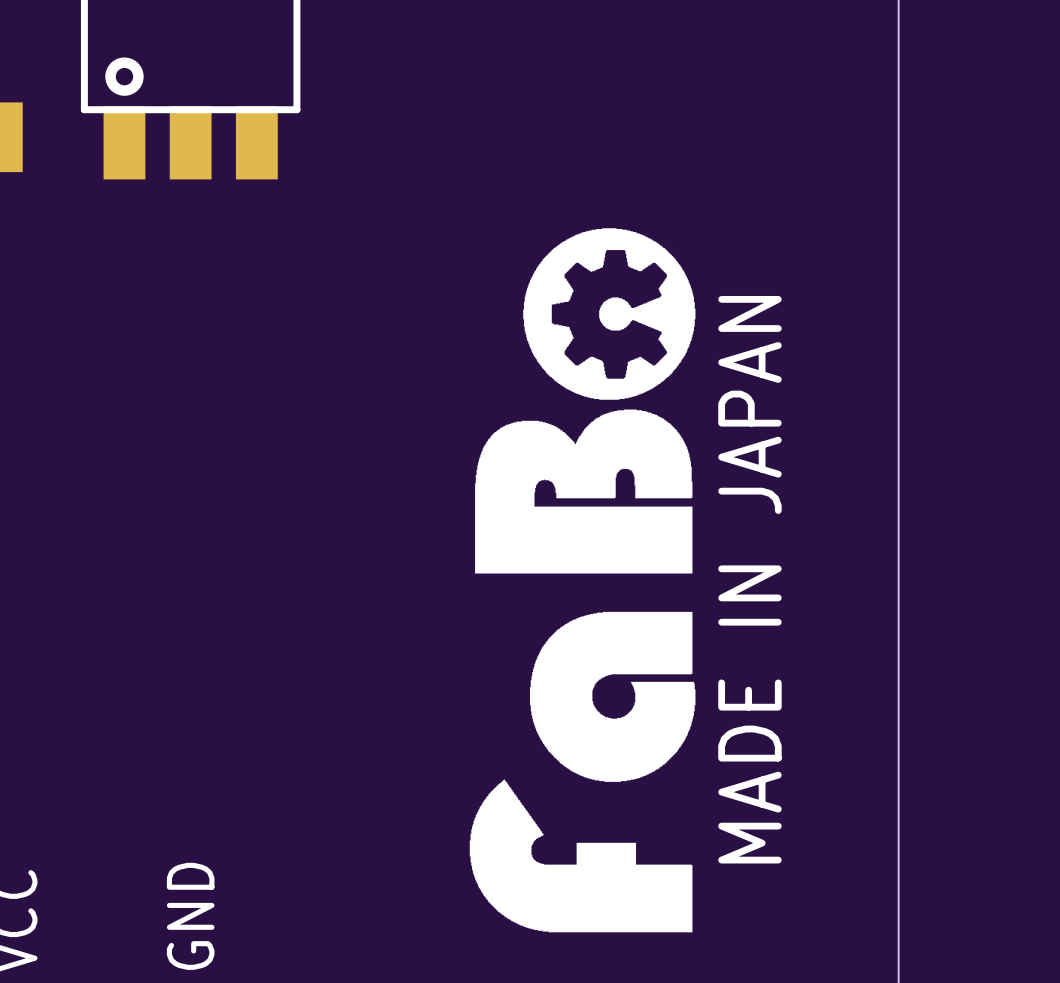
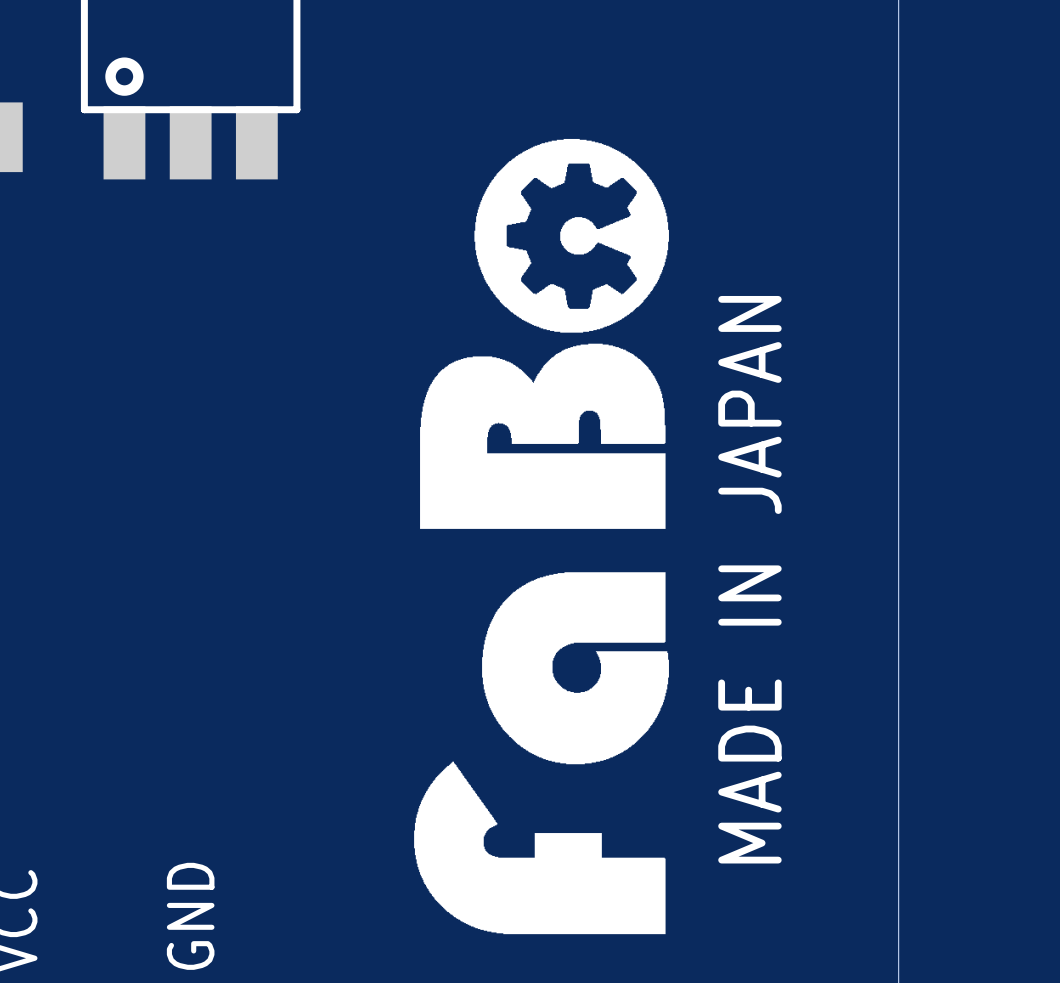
drawing shape: [469, 228, 696, 933] -> [414, 138, 669, 935]

